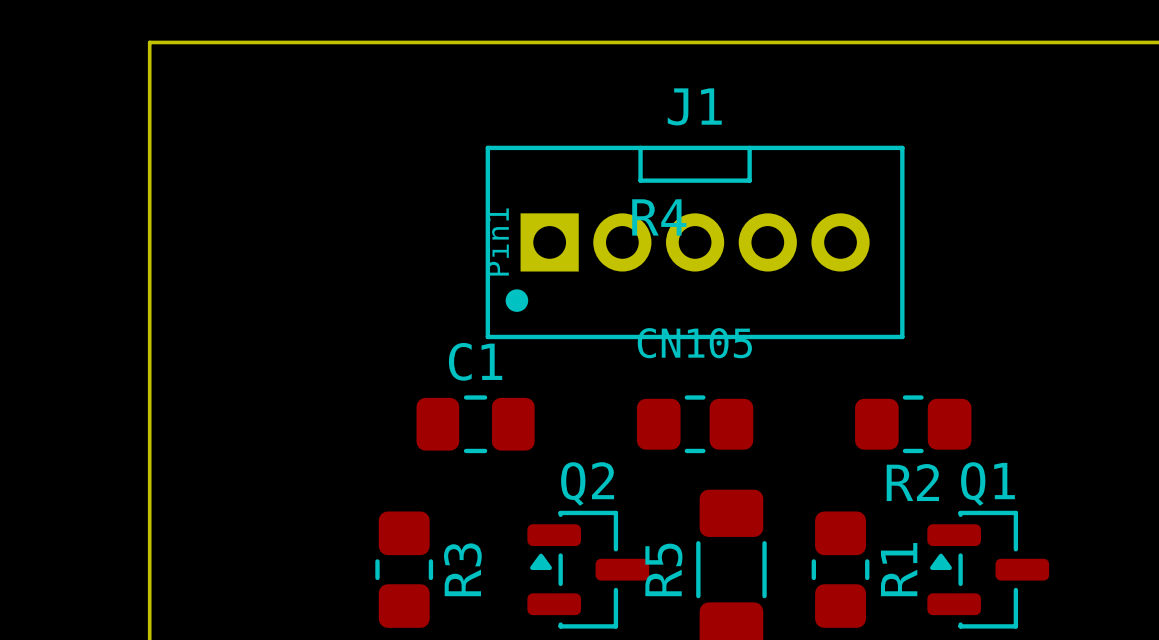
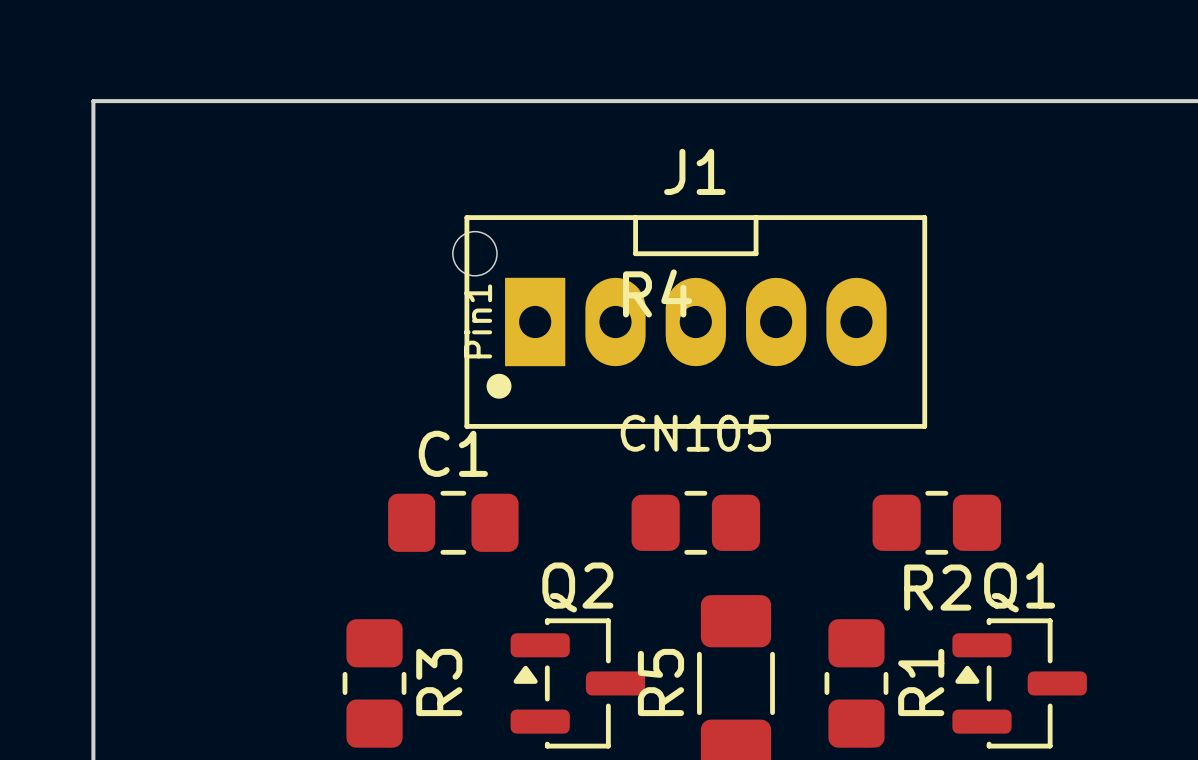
J1 footprint: [485, 145, 905, 340] -> [452, 215, 928, 429]

